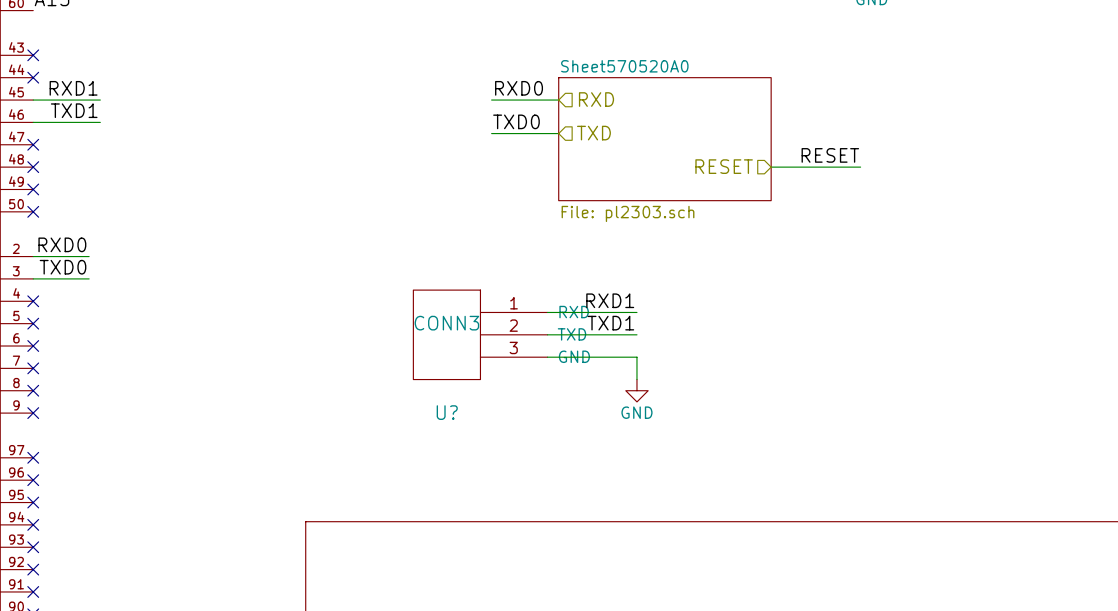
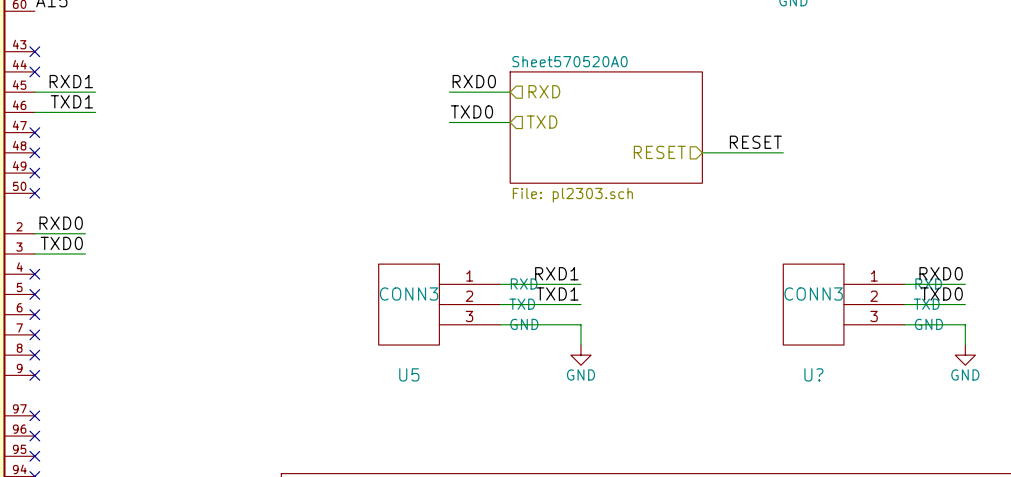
label: none -> RXD0 (941, 273)
wire: none -> (904, 284) (965, 284)
label: none -> TXD0 (941, 293)
U?: none -> CONN3 (843, 304)
wire: none -> (904, 304) (965, 304)
wire: none -> (904, 324) (965, 324) (965, 345)
power symbol: none -> GND (965, 355)
U? name: U? (447, 412) -> U5 (409, 374)

